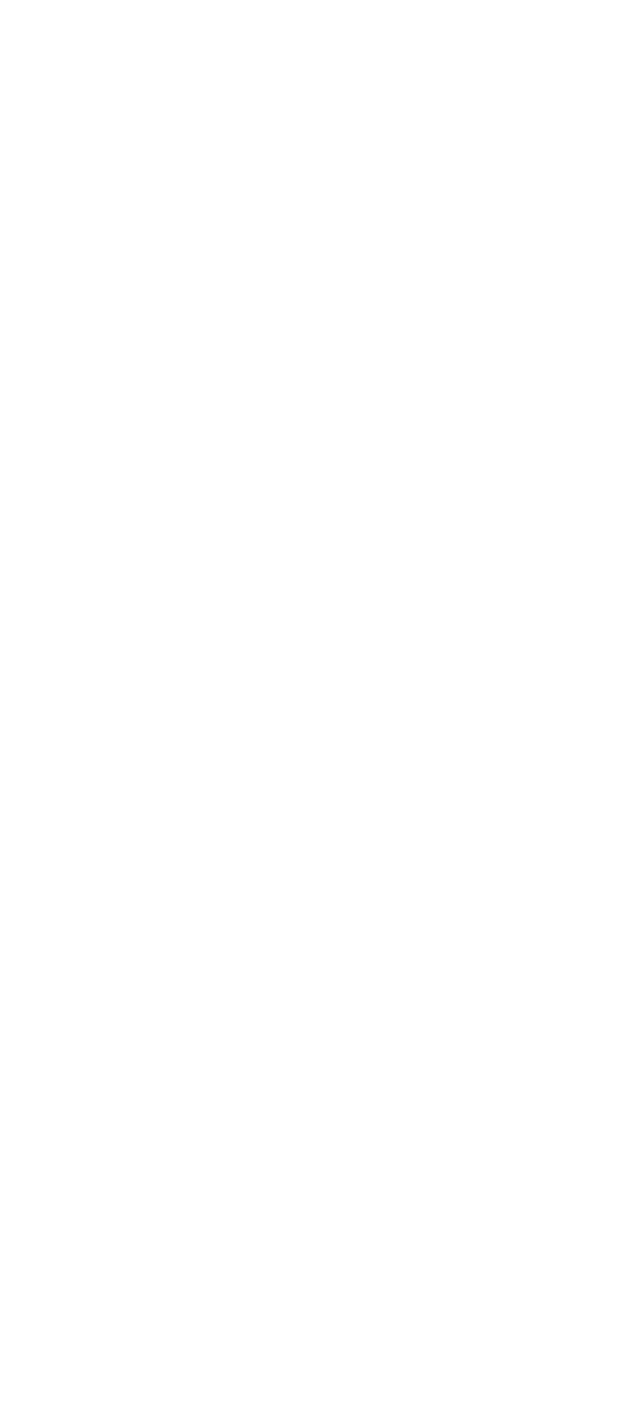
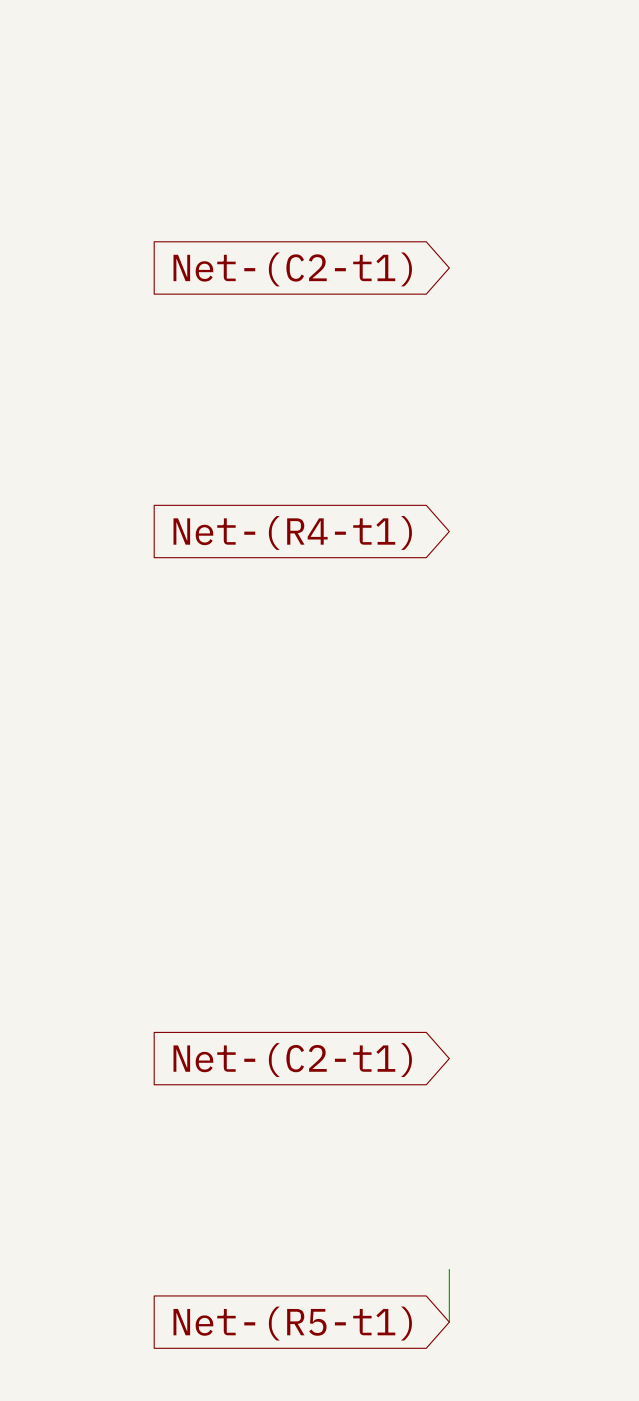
global label: none -> Net-(C2-t1) (292, 269)
global label: none -> Net-(R4-t1) (292, 532)
global label: none -> Net-(C2-t1) (292, 1060)
wire: none -> (449, 1269) (449, 1322)
global label: none -> Net-(R5-t1) (292, 1323)

